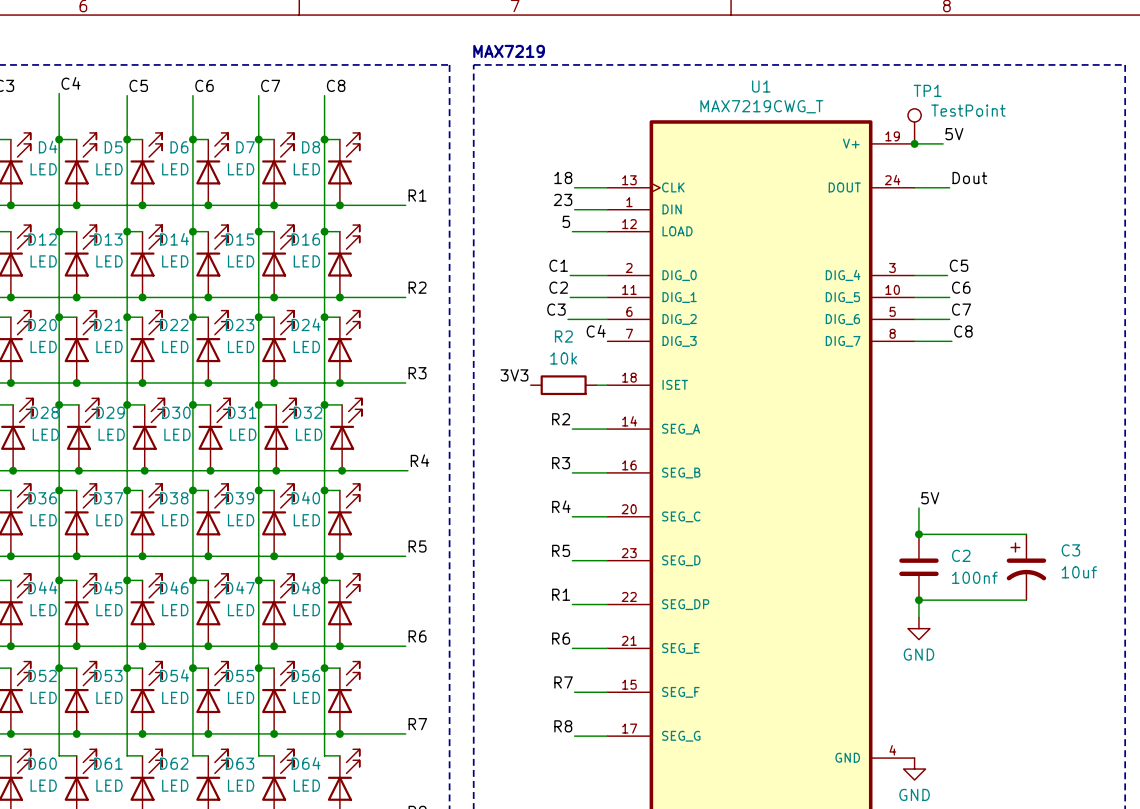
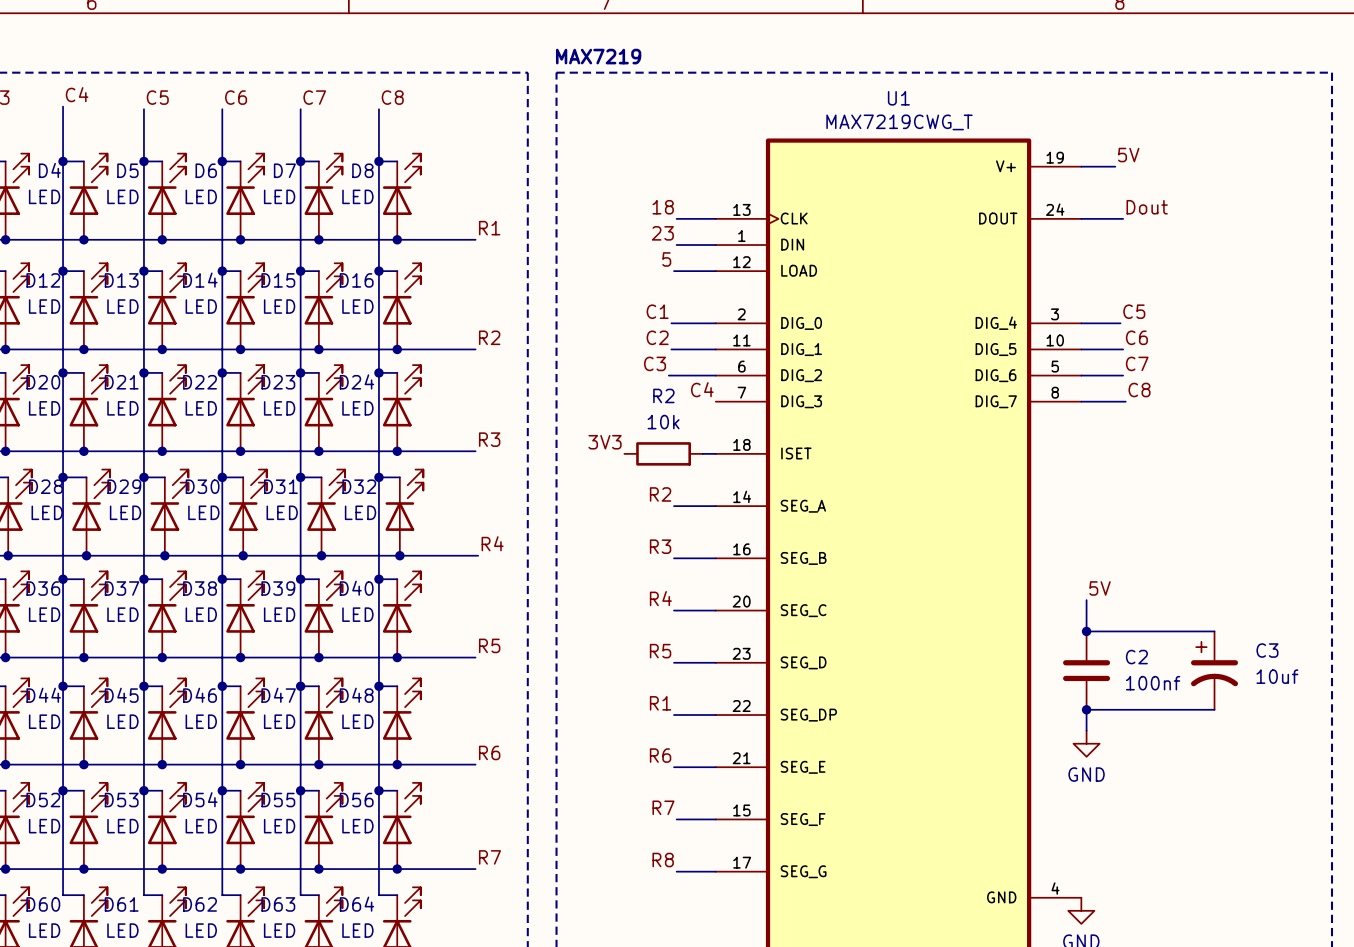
TP1: TestPoint (914, 126) -> none
junction: (914, 143) -> none

